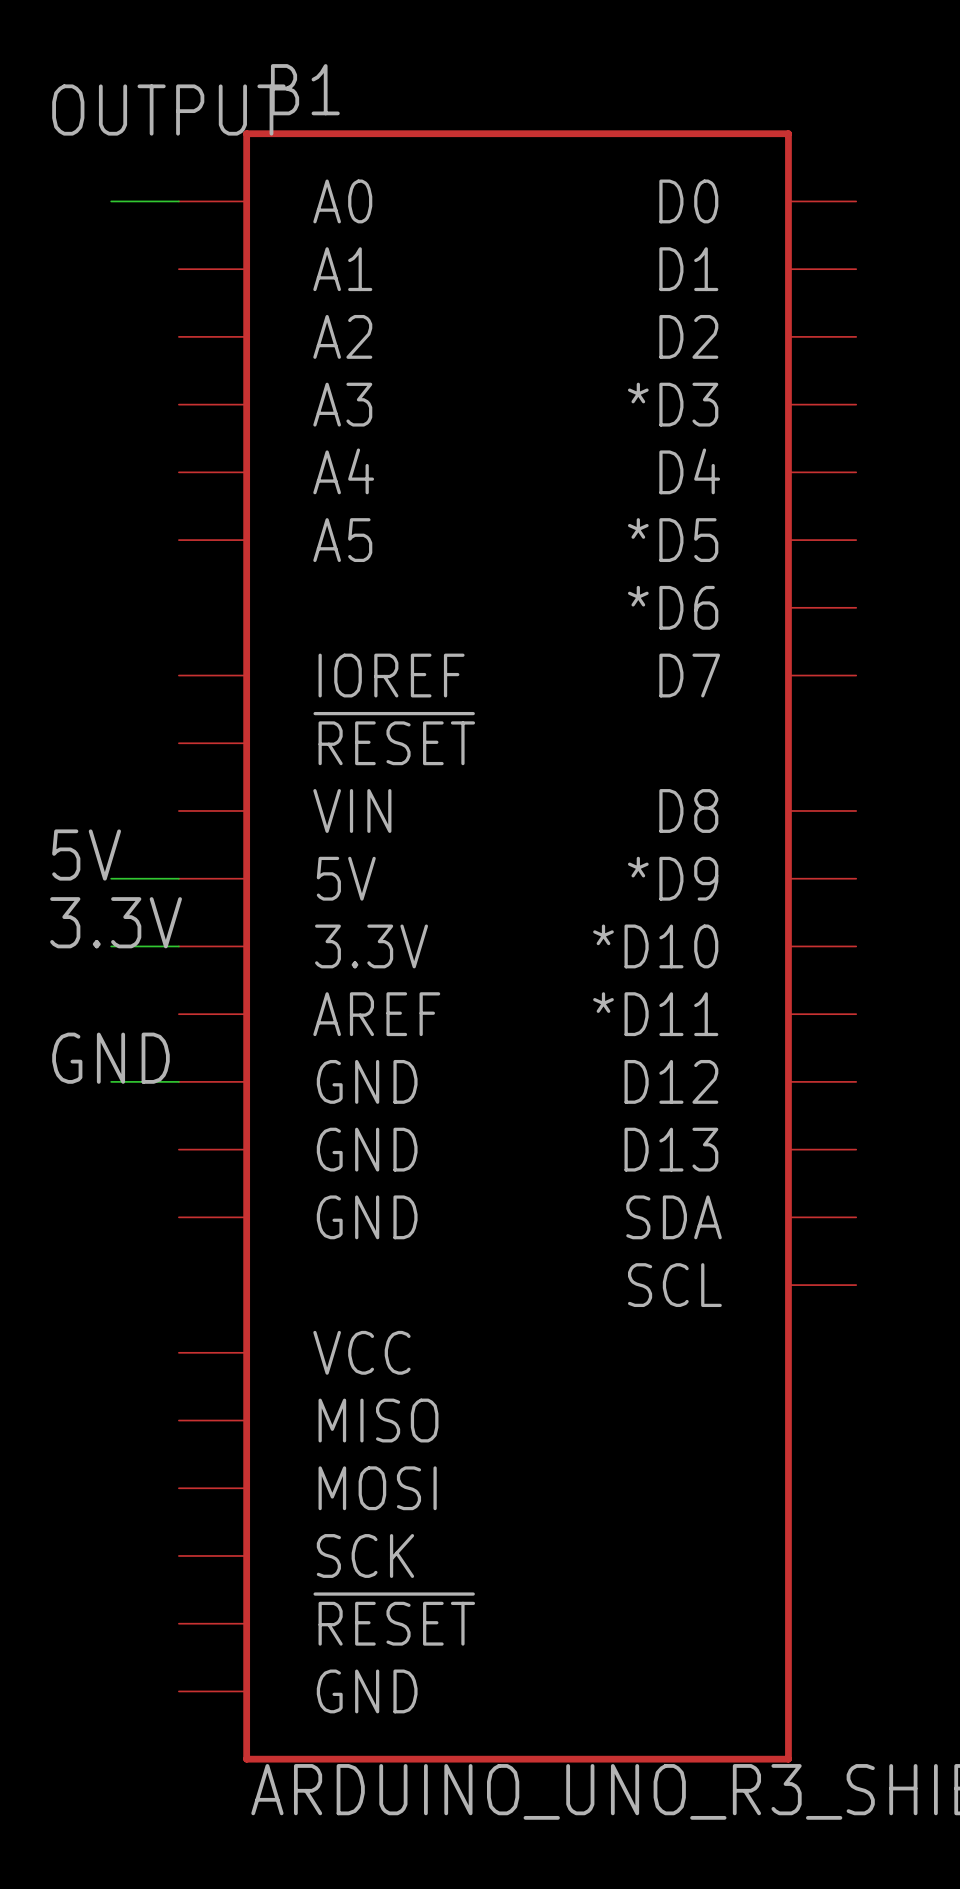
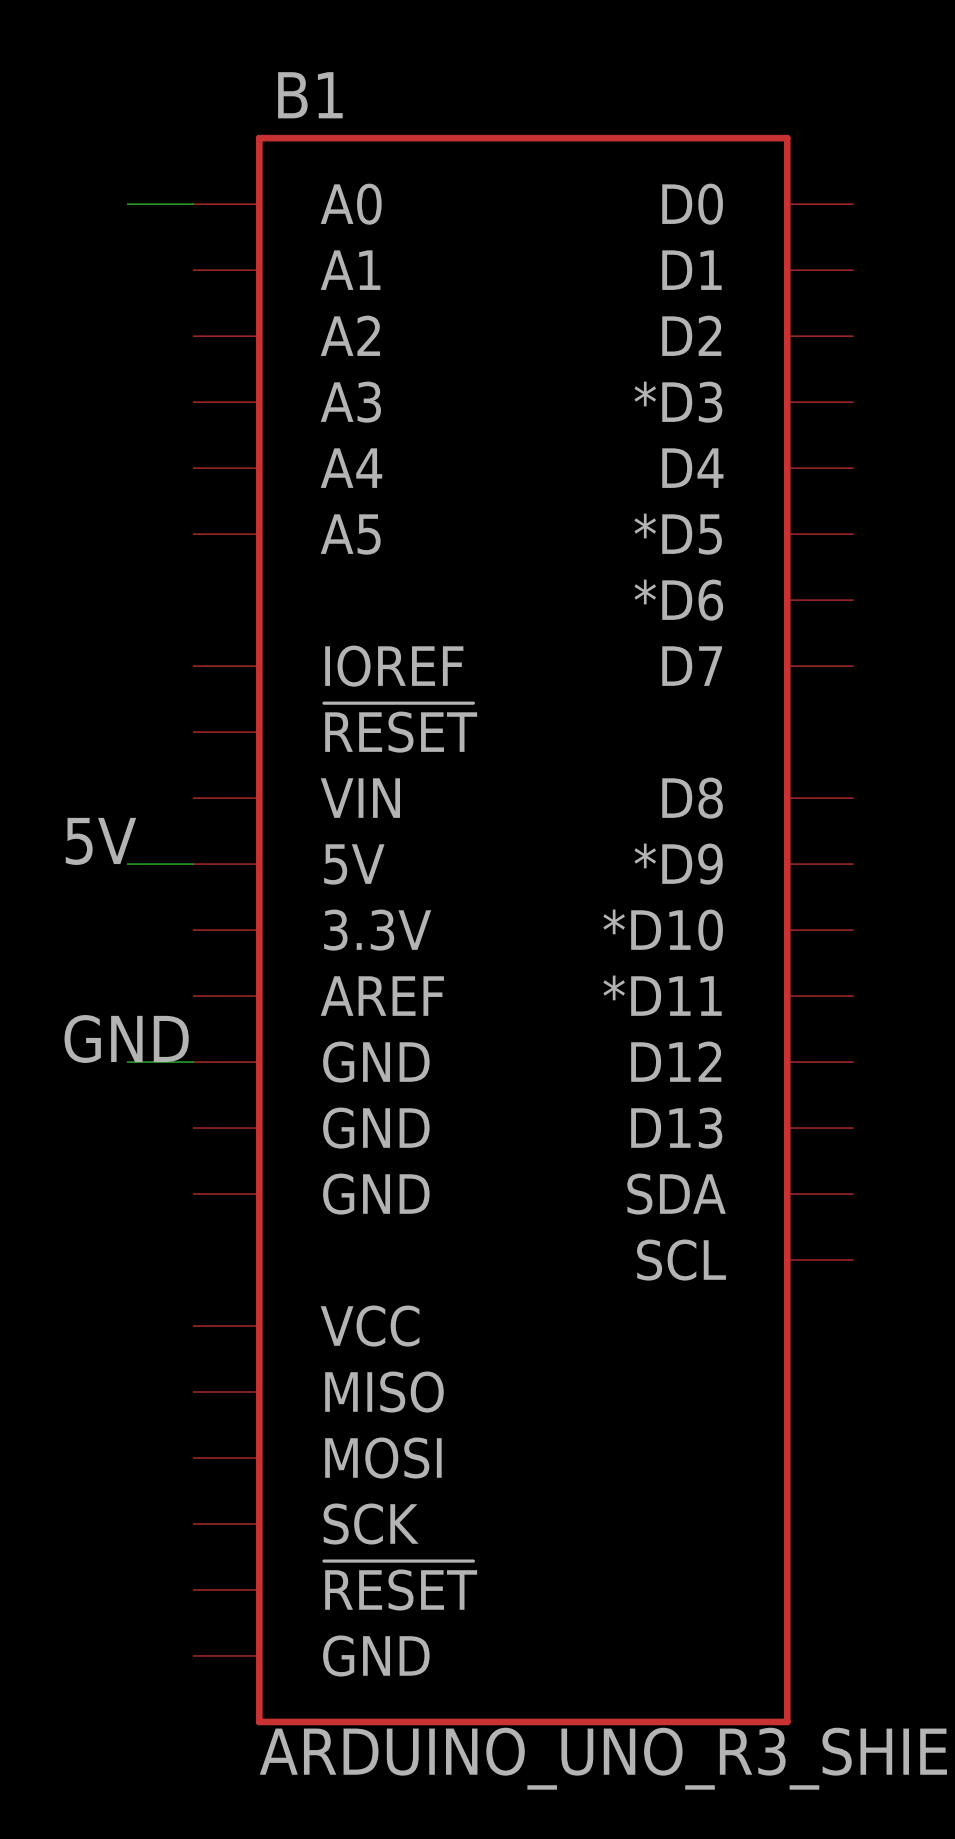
label: OUTPUT (168, 110) -> none
label: 3.3V (116, 922) -> none
wire: (111, 946) (178, 946) -> none

